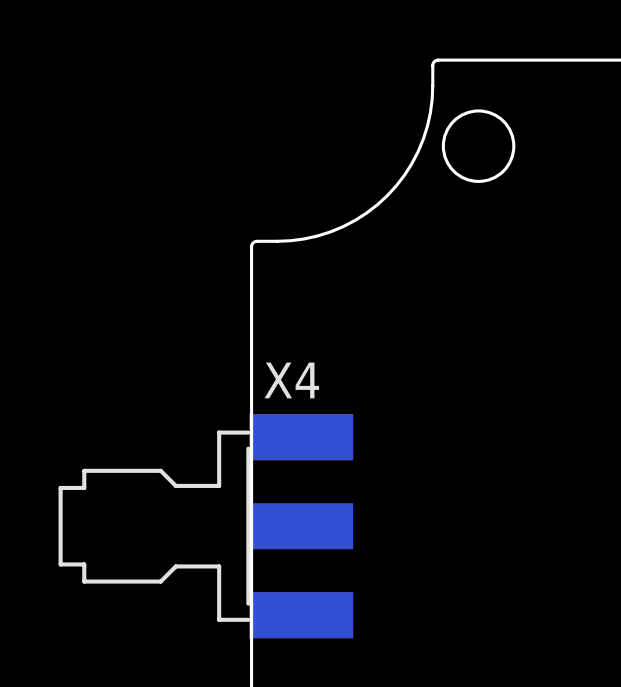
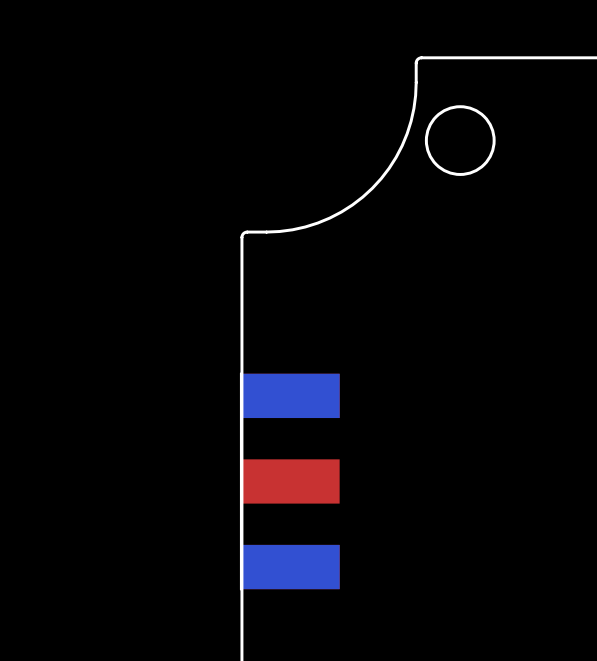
part: none -> (290, 481)
X4: (205, 526) -> none

